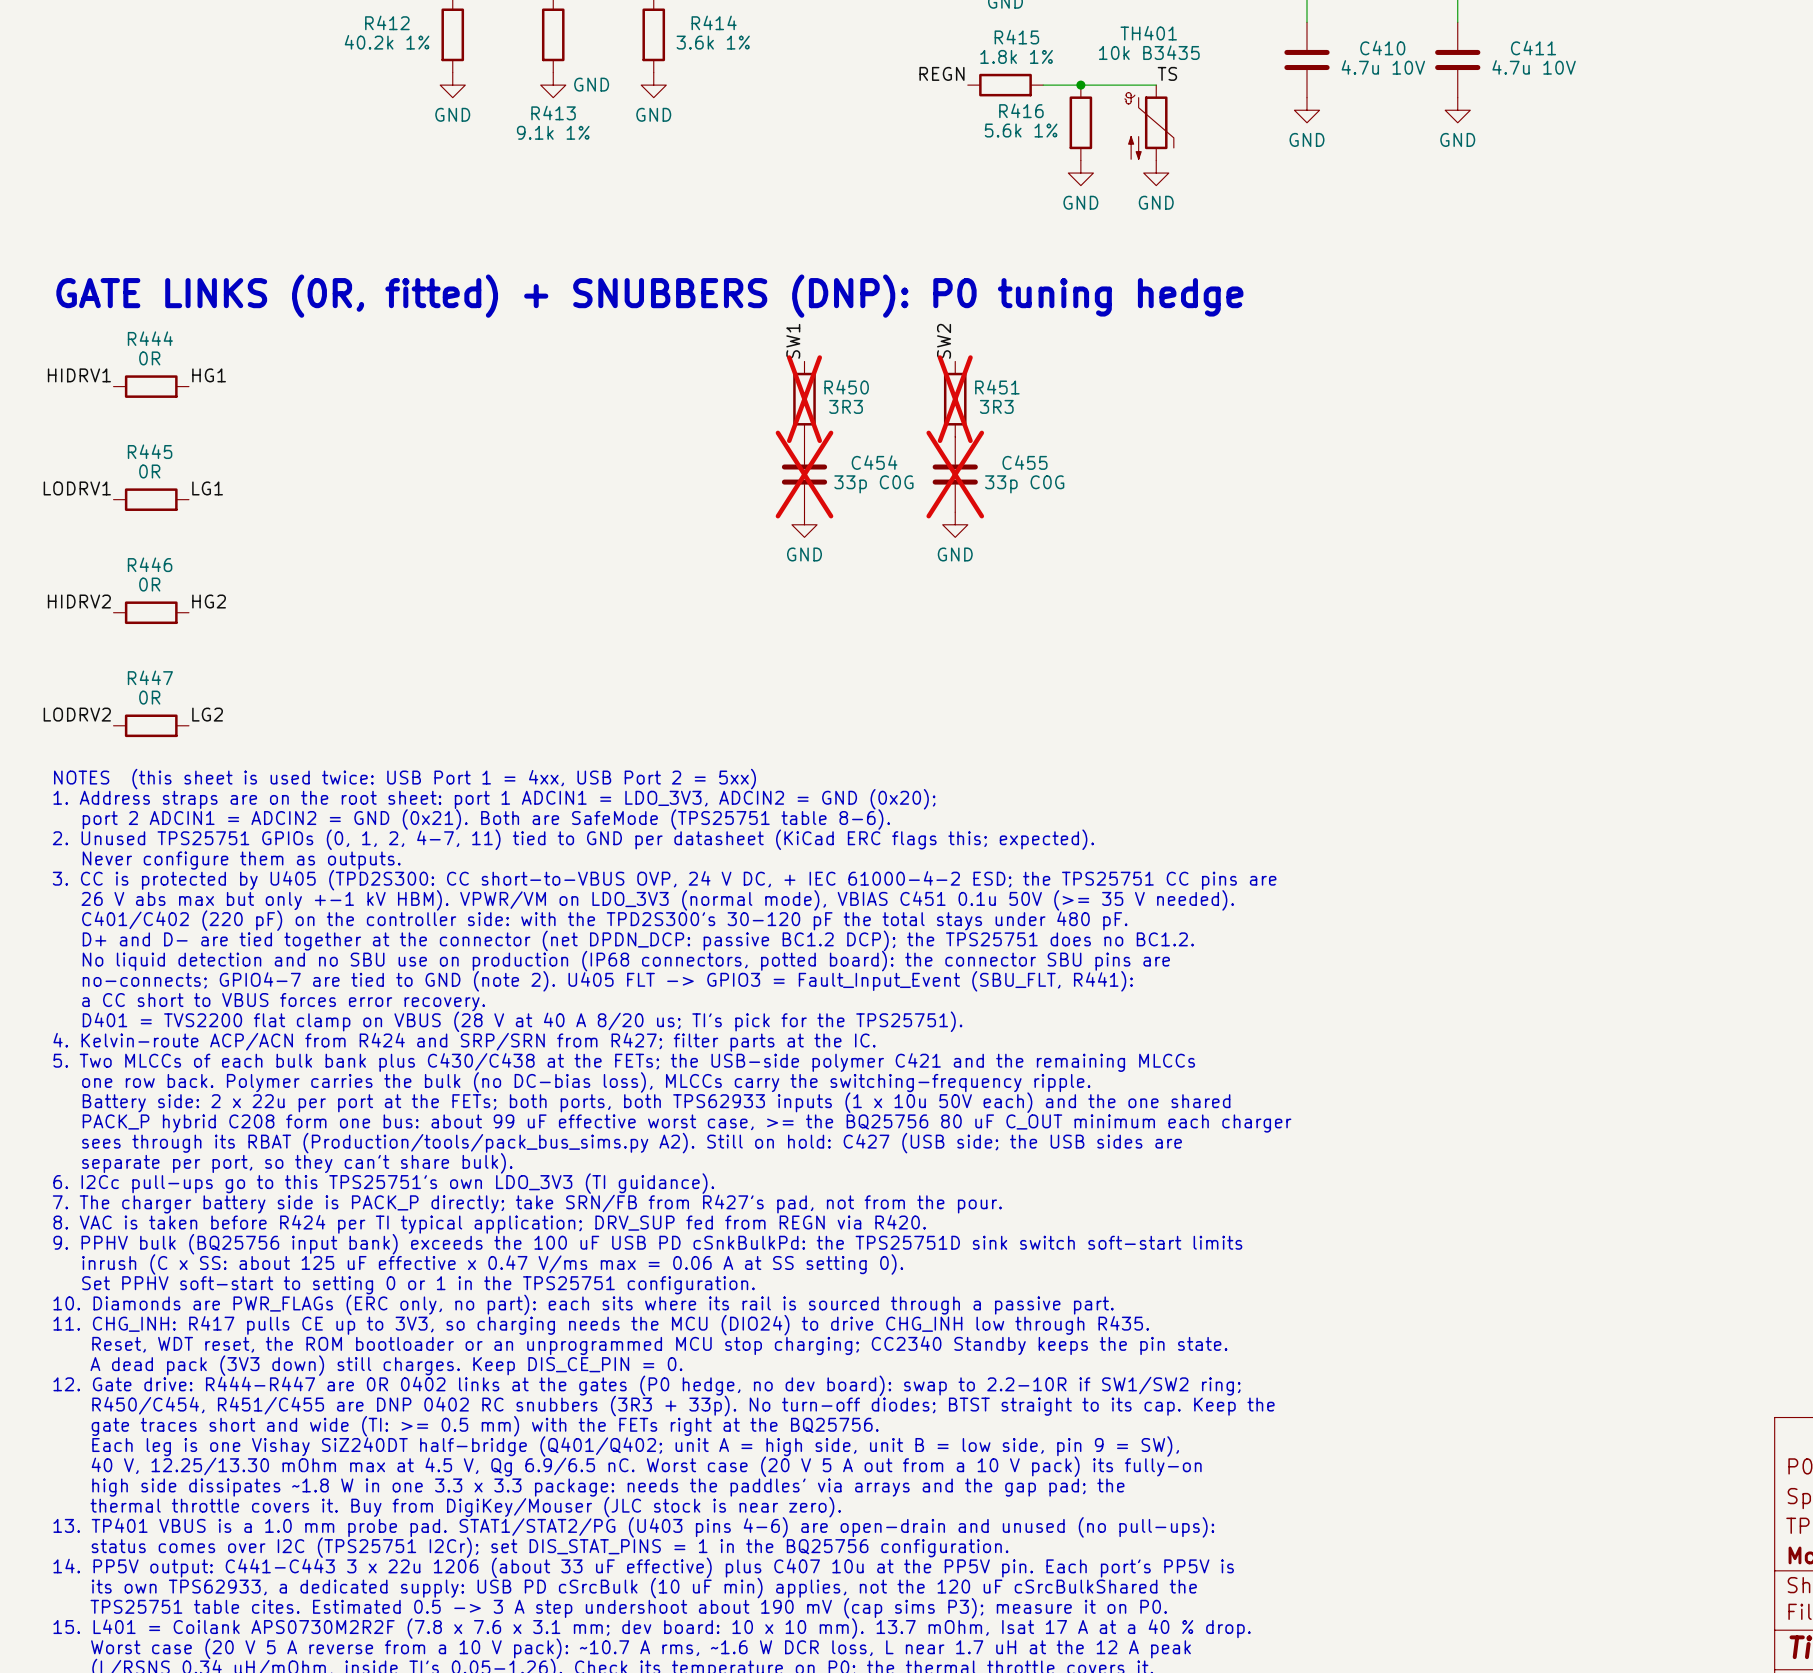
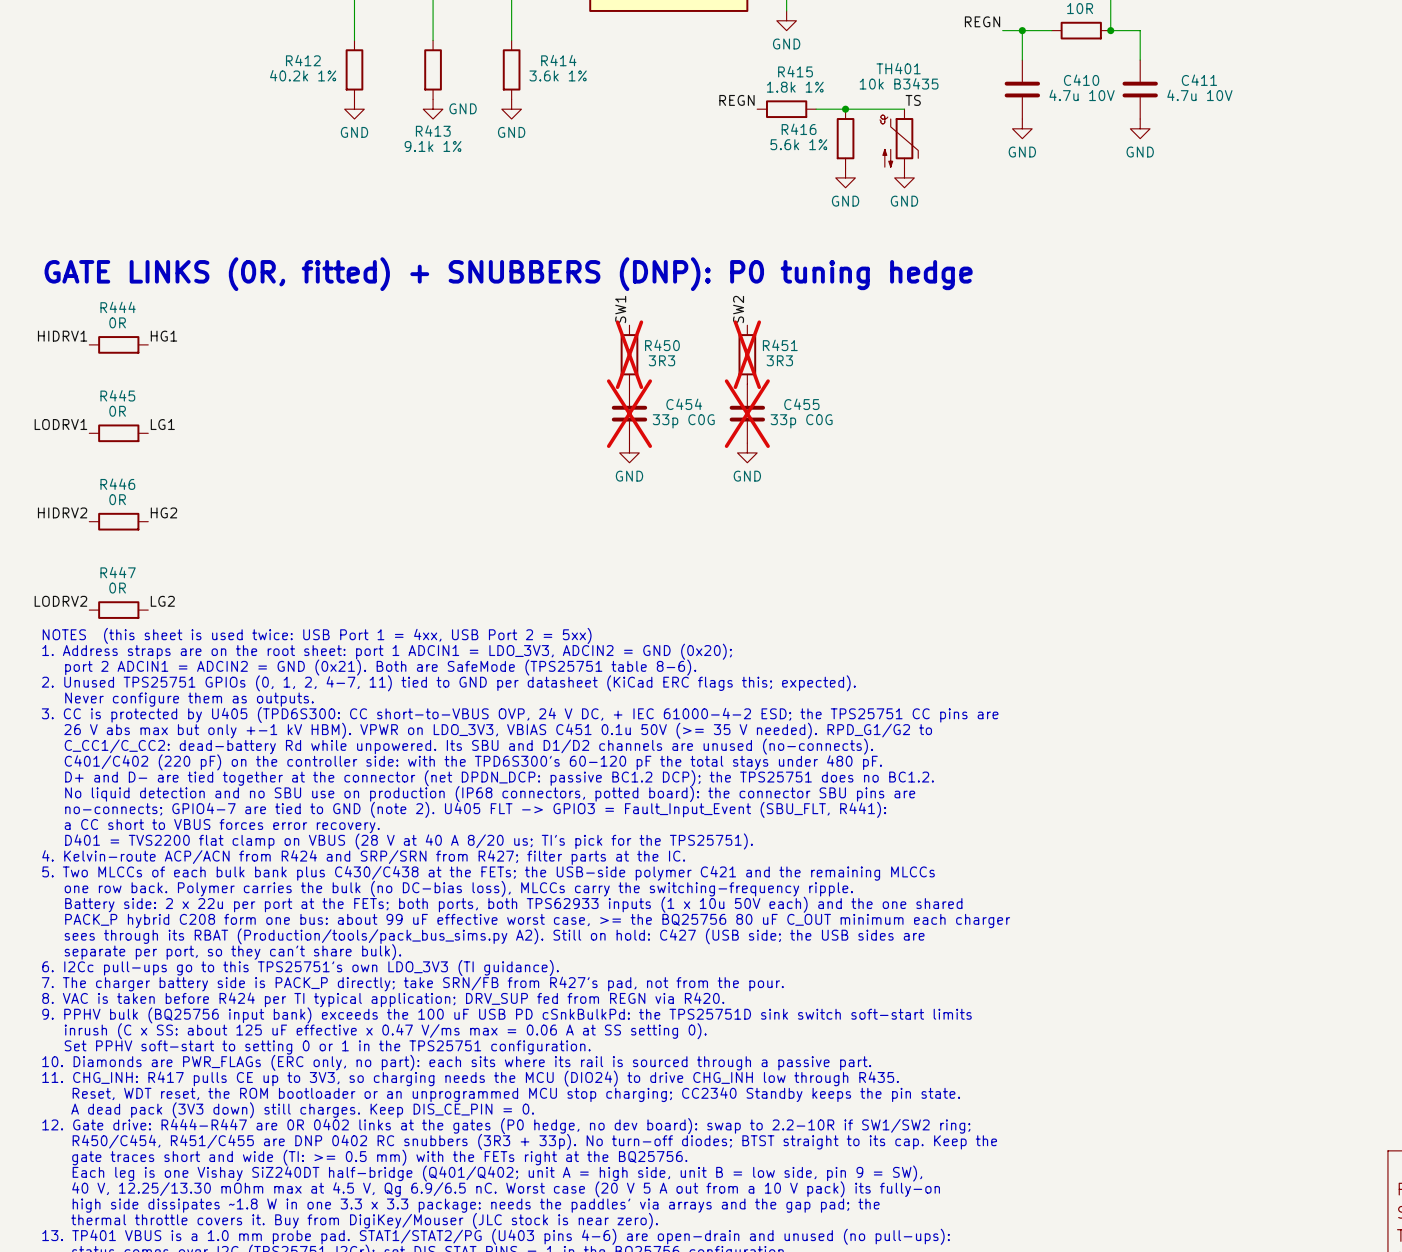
text: none -> NOTES (this sheet is used twice: USB Port 1 = 4xx, USB Port 2 = 5xx) (317, 635)
text: NOTES (this sheet is used twice: USB Port 1 = 4xx, USB Port 2 = 5xx) (404, 779) -> 1. Address straps are on the root sheet: port 1 ADCIN1 = LDO_3V3, ADCIN2 = GND (0x20); (387, 651)
text: 1. Address straps are on the root sheet: port 1 ADCIN1 = LDO_3V3, ADCIN2 = GND (0x20); (494, 799) -> port 2 ADCIN1 = ADCIN2 = GND (0x21). Both are SafeMode (TPS25751 table 8-6). (380, 667)
text: port 2 ADCIN1 = ADCIN2 = GND (0x21). Both are SafeMode (TPS25751 table 8-6). (486, 819) -> 2. Unused TPS25751 GPIOs (0, 1, 2, 4-7, 11) tied to GND per datasheet (KiCad ERC flags this; expected). (448, 683)
text: 2. Unused TPS25751 GPIOs (0, 1, 2, 4-7, 11) tied to GND per datasheet (KiCad ERC flags this; expected). (573, 839) -> Never configure them as outputs. (189, 699)
text: Never configure them as outputs. (241, 860) -> 3. CC is protected by U405 (TPD6S300: CC short-to-VBUS OVP, 24 V DC, + IEC 61000-4-2 ESD; the TPS25751 CC pins are (520, 714)
text: 3. CC is protected by U405 (TPD2S300: CC short-to-VBUS OVP, 24 V DC, + IEC 61000-4-2 ESD; the TPS25751 CC pins are (664, 880) -> 26 V abs max but only +-1 kV HBM). VPWR on LDO_3V3, VBIAS C451 0.1u 50V (>= 35 V needed). RPD_G1/G2 to (498, 730)
text: 26 V abs max but only +-1 kV HBM). VPWR/VM on LDO_3V3 (normal mode), VBIAS C451 0.1u 50V (>= 35 V needed). (657, 900) -> C_CC1/C_CC2: dead-battery Rd while unpowered. Its SBU and D1/D2 channels are unused (no-connects). (468, 746)
text: C401/C402 (220 pF) on the controller side: with the TPD2S300's 30-120 pF the total stays under 480 pF. (604, 920) -> C401/C402 (220 pF) on the controller side: with the TPD6S300's 60-120 pF the total stays under 480 pF. (473, 762)

